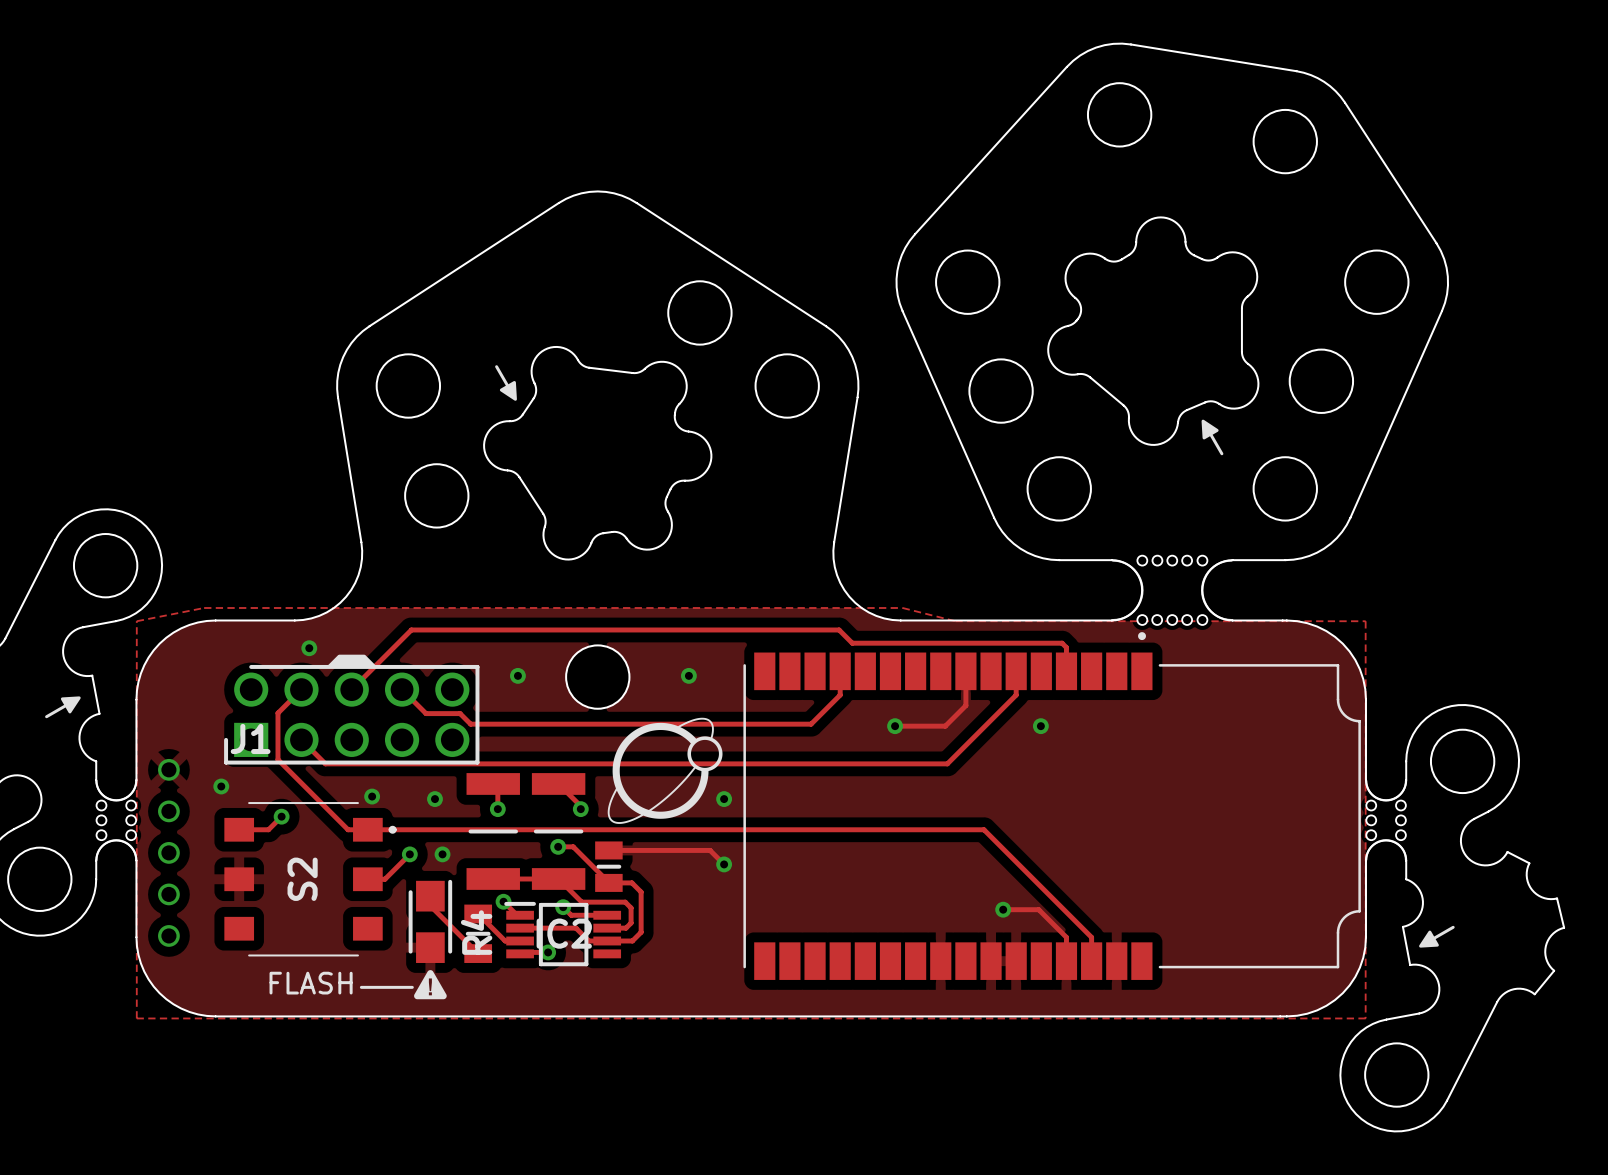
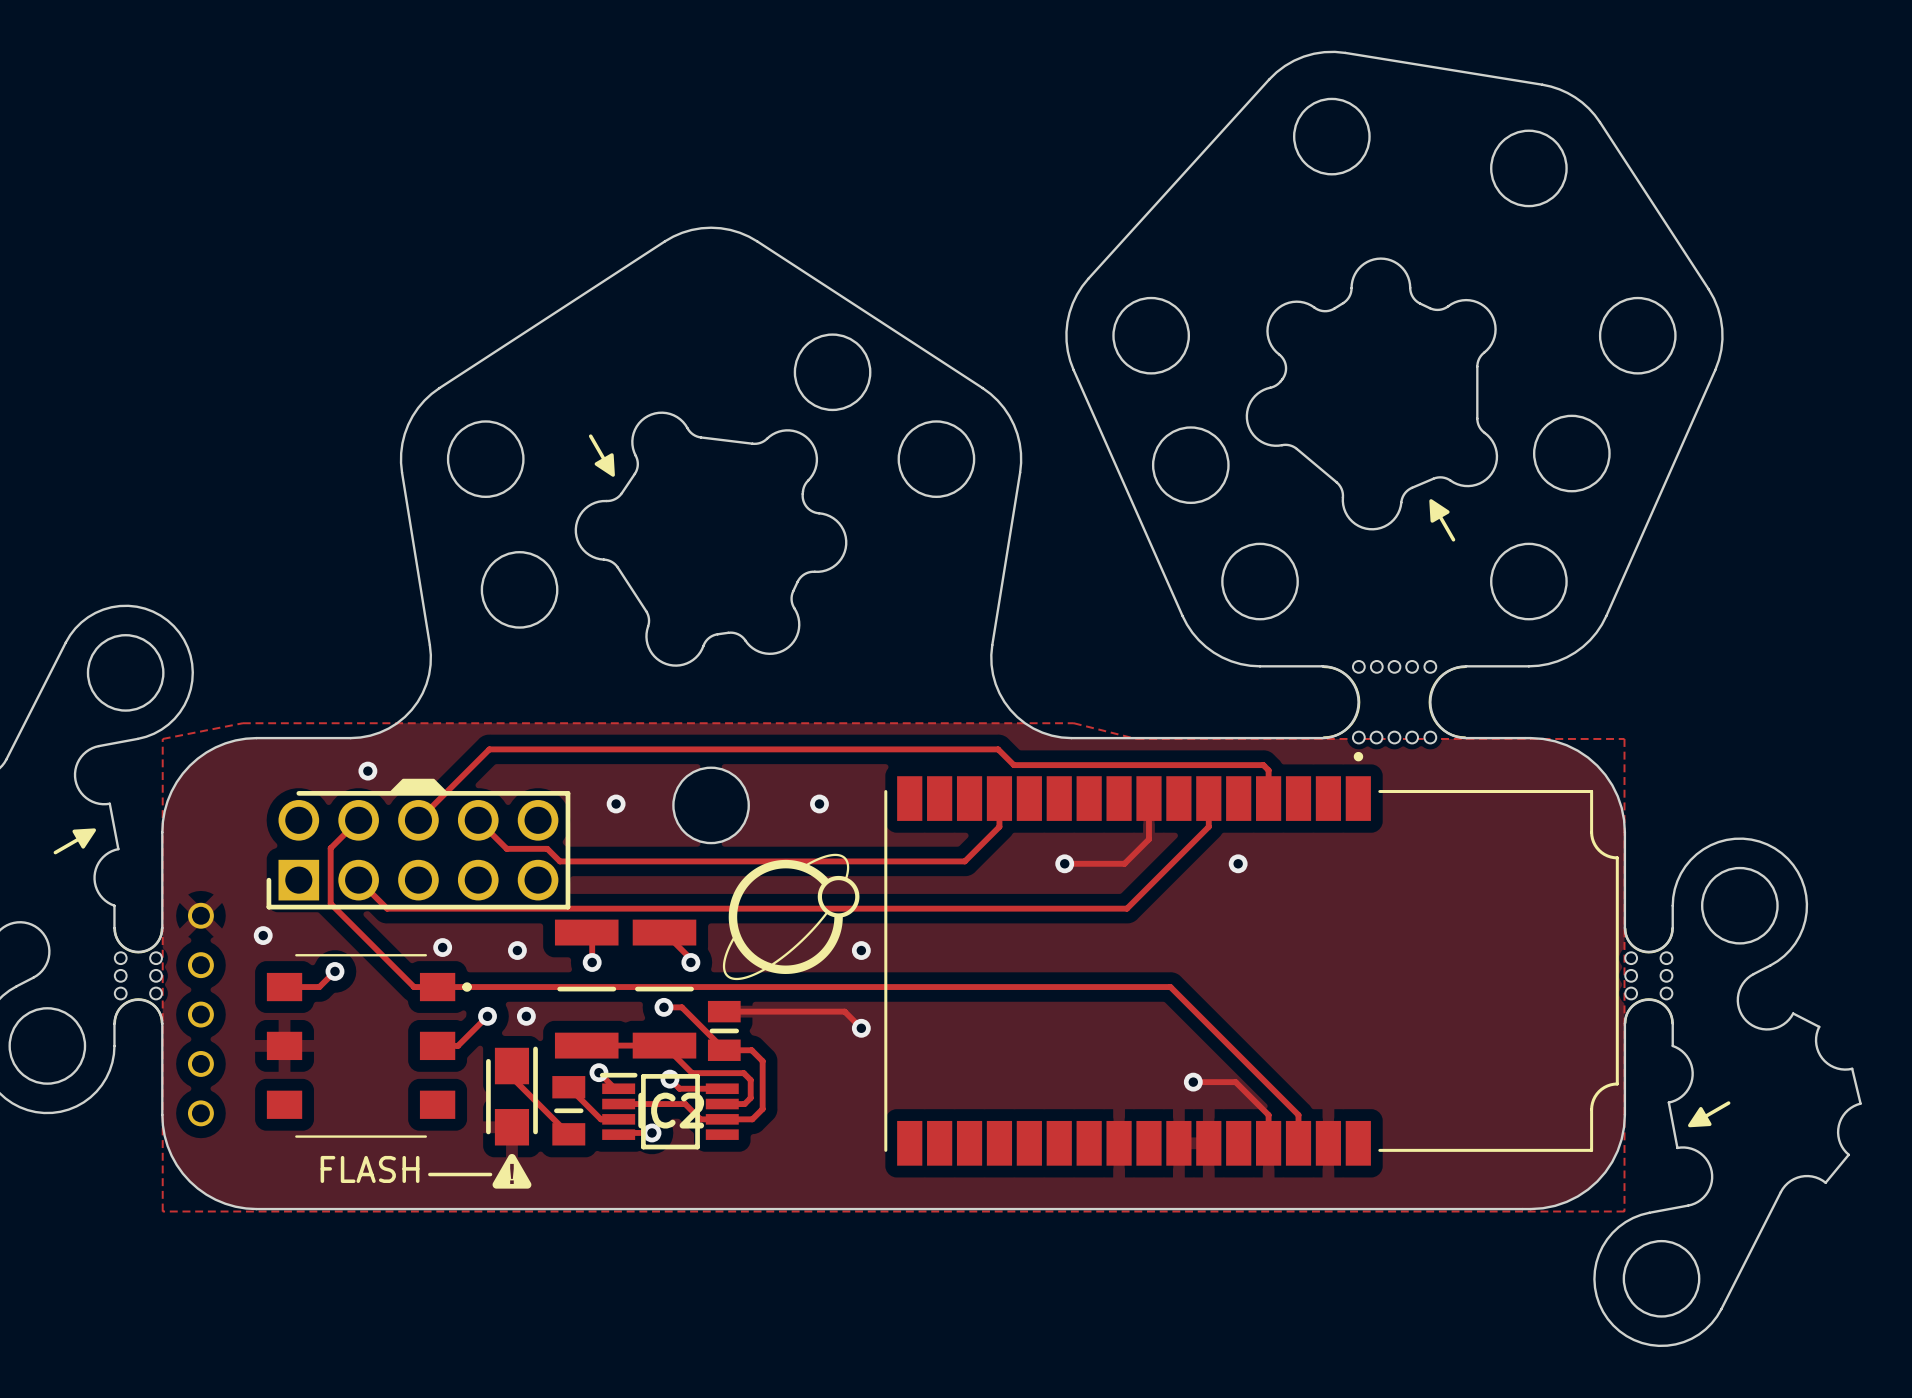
J1 name: J1 (250, 738) -> none
S2 name: S2 (302, 879) -> none
R4 name: R4 (476, 932) -> none

